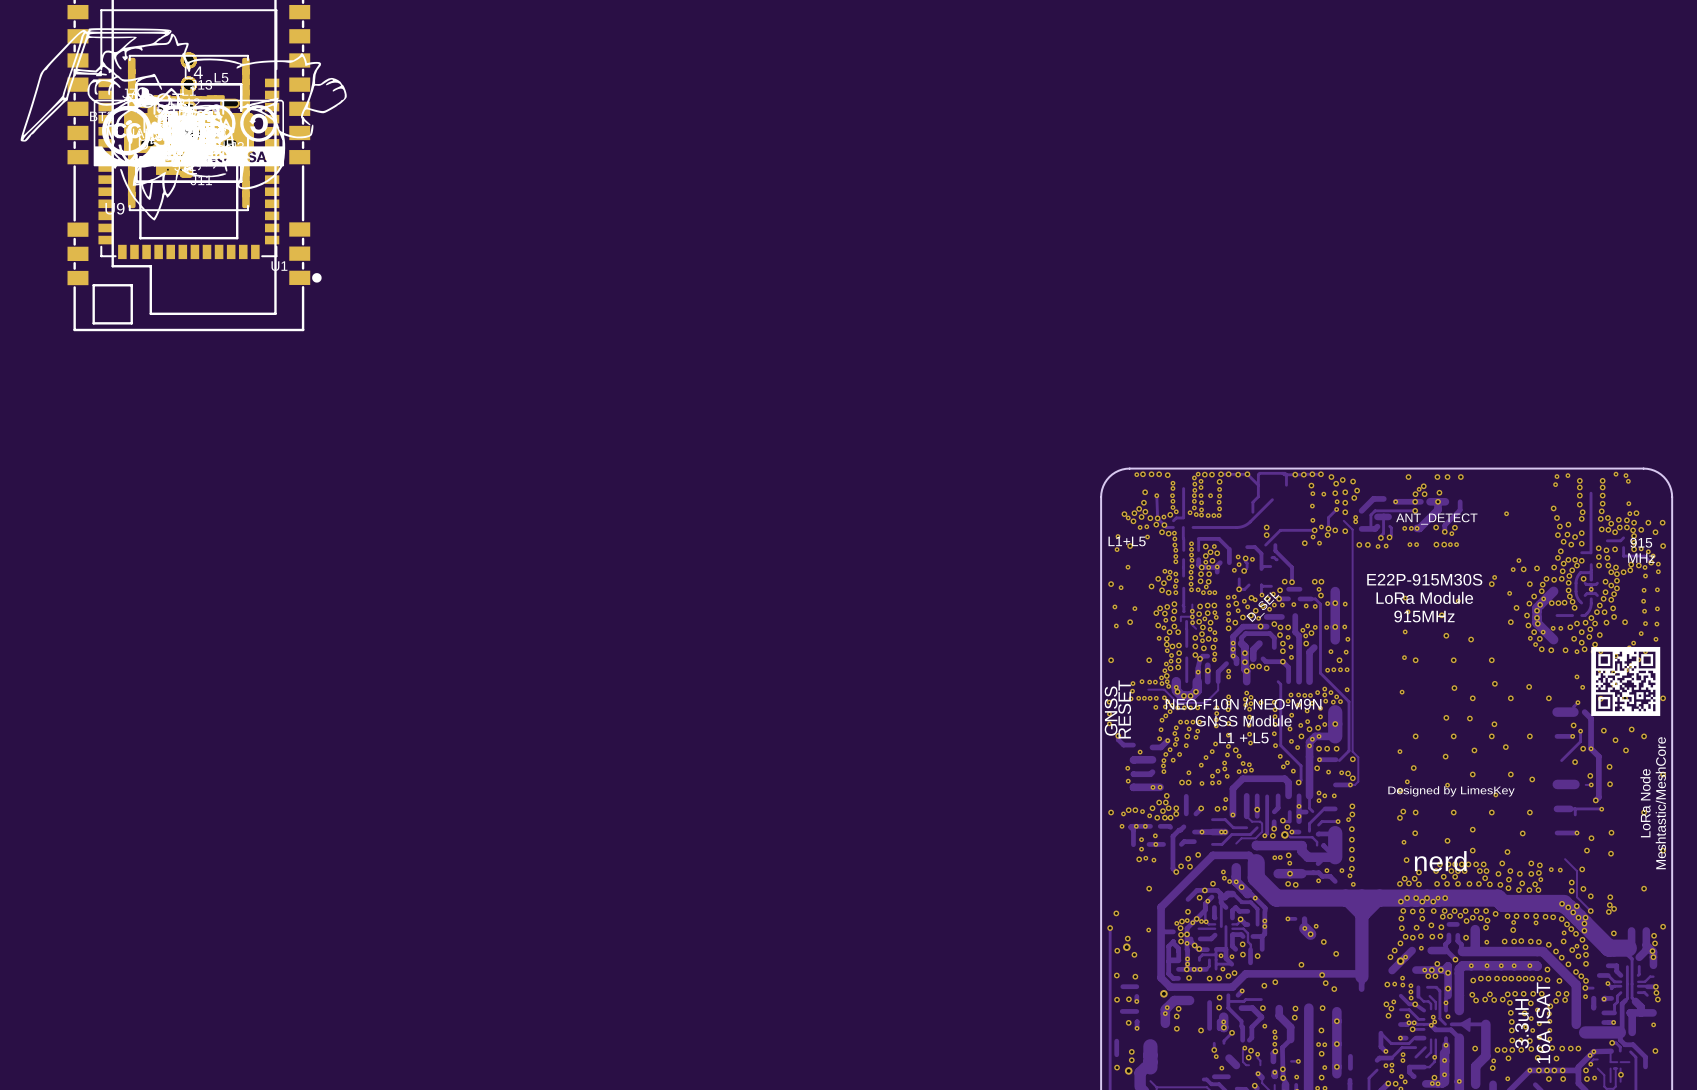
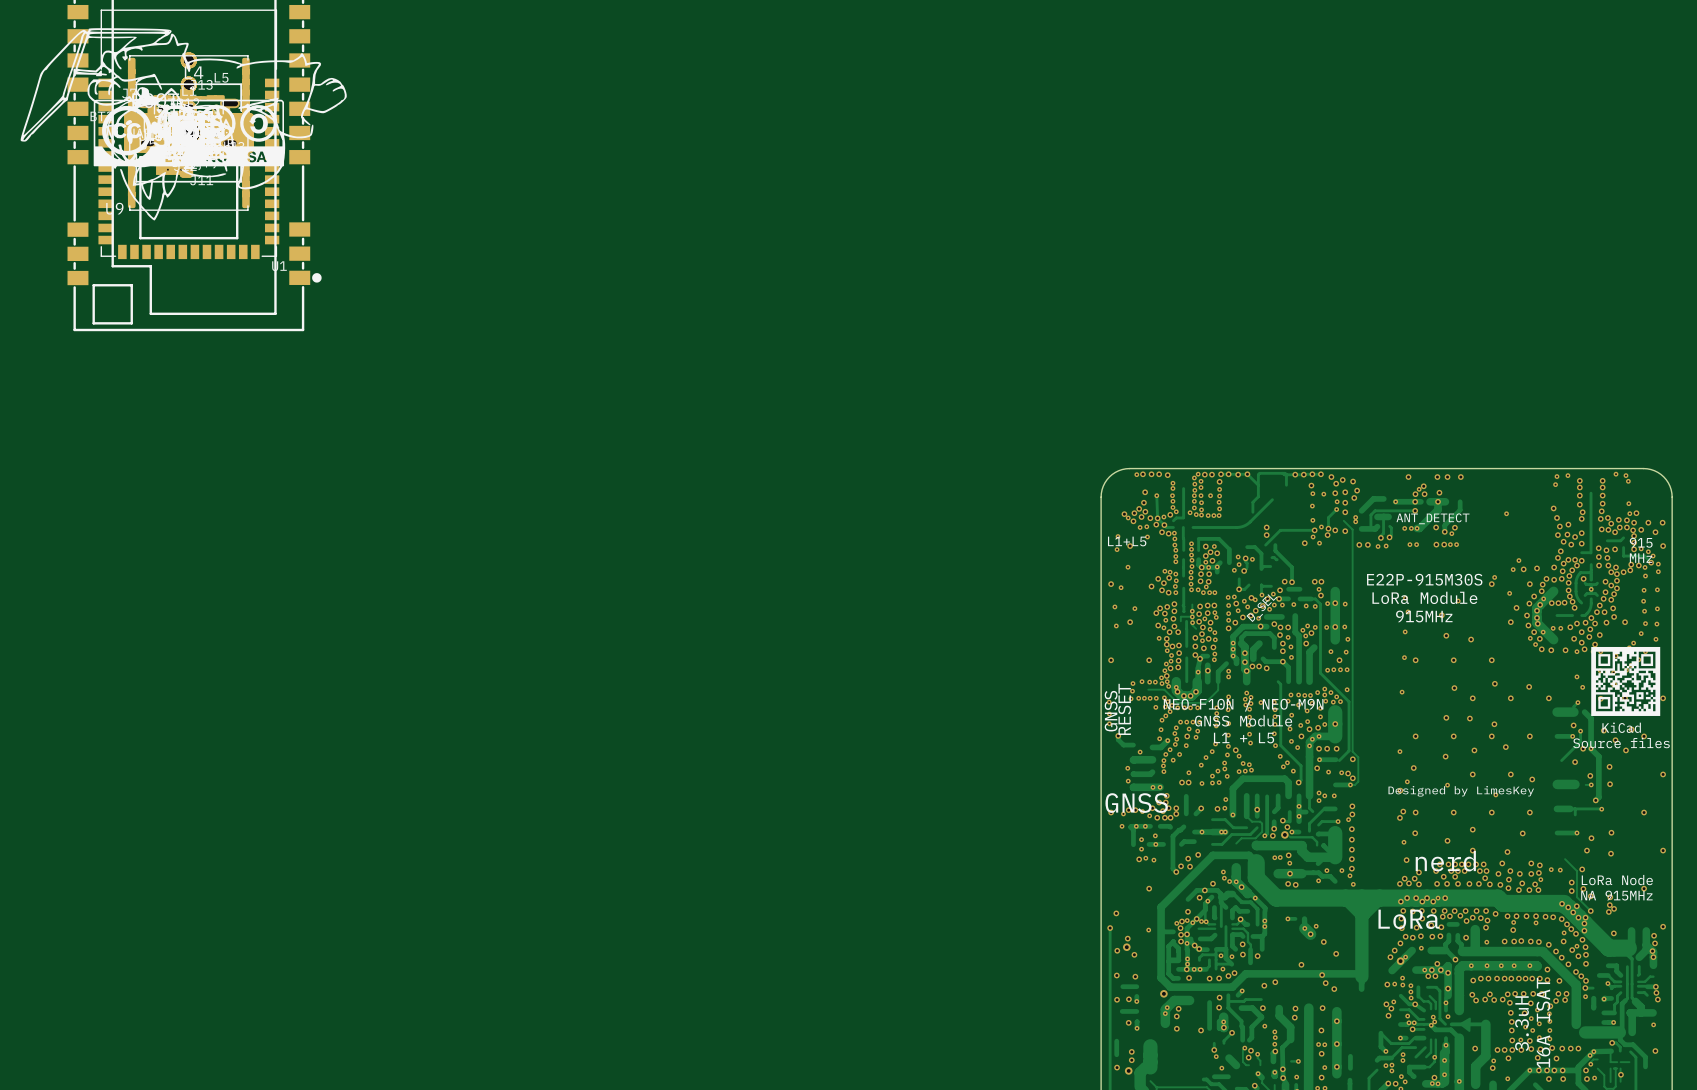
text: none -> KiCad (1621, 727)
text: none -> Source files (1621, 743)
text: none -> GNSS (1136, 803)
text rotation: 0° (1645, 803) -> 90° clockwise (1617, 880)
text: Meshtastic/MeshCore (1660, 803) -> none
text: none -> NA 915MHz (1616, 895)
text: none -> LoRa (1408, 919)

